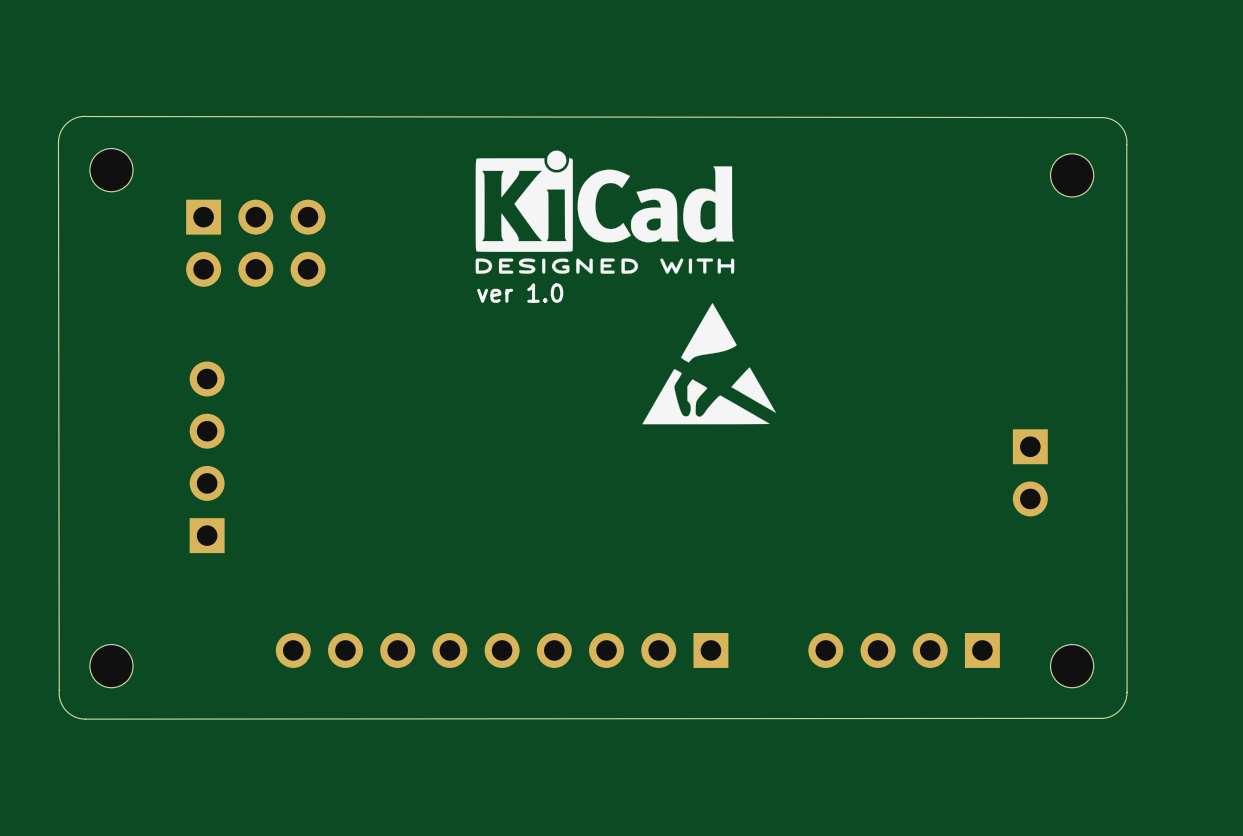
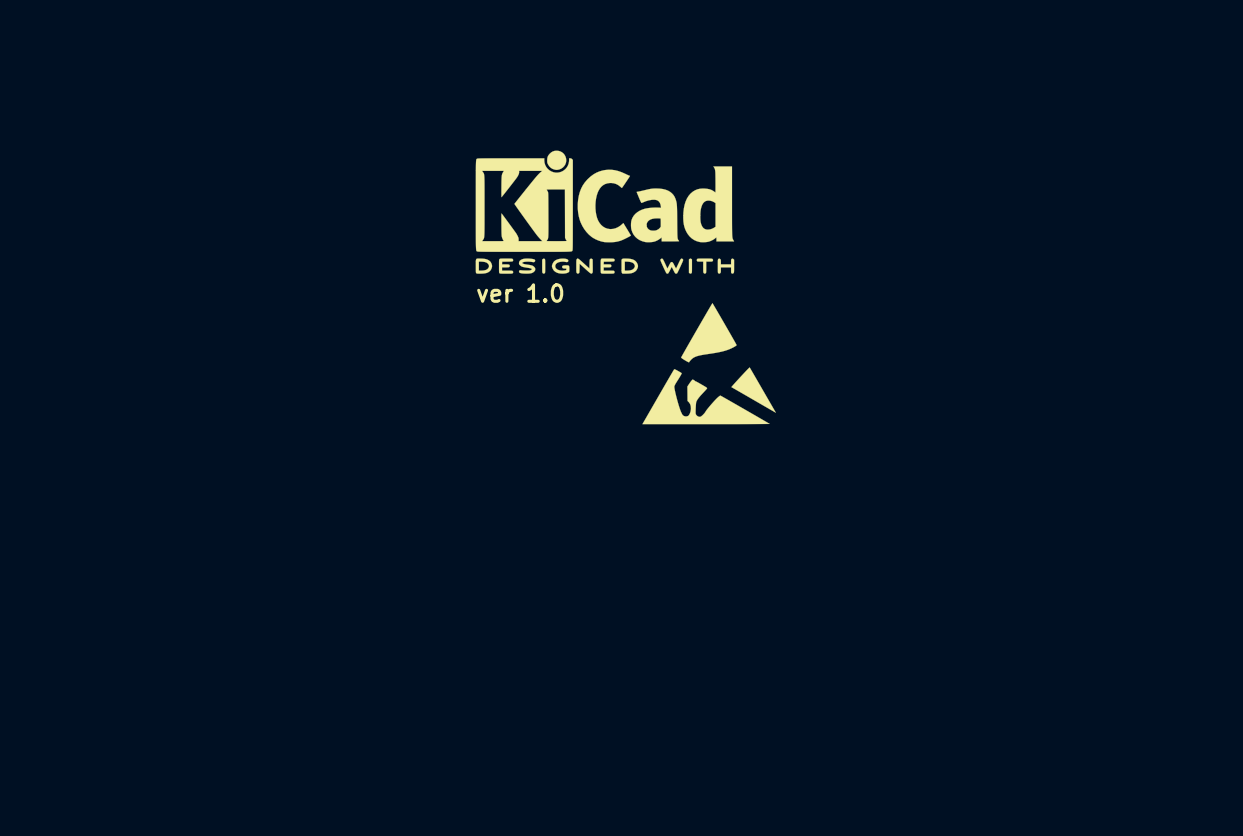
board edge: (87, 116) (1102, 117) (1113, 120) (1122, 128) (1126, 141) (1127, 692) (1124, 704) (1113, 715) (1101, 718) (85, 719) (73, 716) (63, 708) (59, 693) (58, 142) (61, 130) (67, 123) (75, 118) (87, 116) -> none
part: (111, 170) -> none
part: (1072, 175) -> none
part: (255, 243) -> none
part: (207, 457) -> none
part: (1030, 472) -> none
part: (502, 650) -> none
part: (904, 650) -> none
part: (111, 666) -> none
part: (1072, 666) -> none

